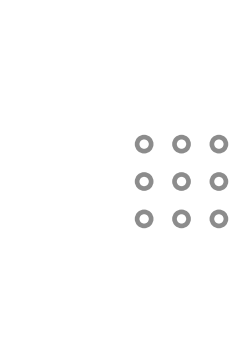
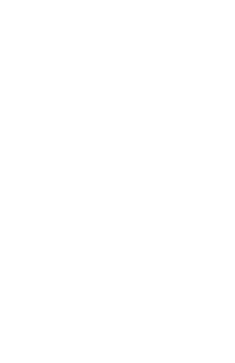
part: (181, 181) -> none

